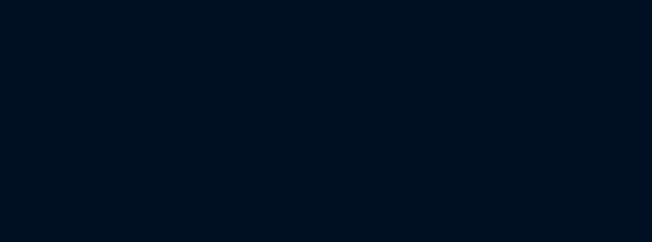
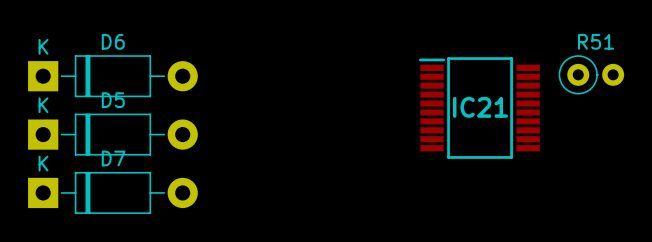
R51: none -> (591, 74)
D6: none -> (112, 76)
IC21: none -> (479, 108)
D5: none -> (112, 134)
D7: none -> (112, 192)

